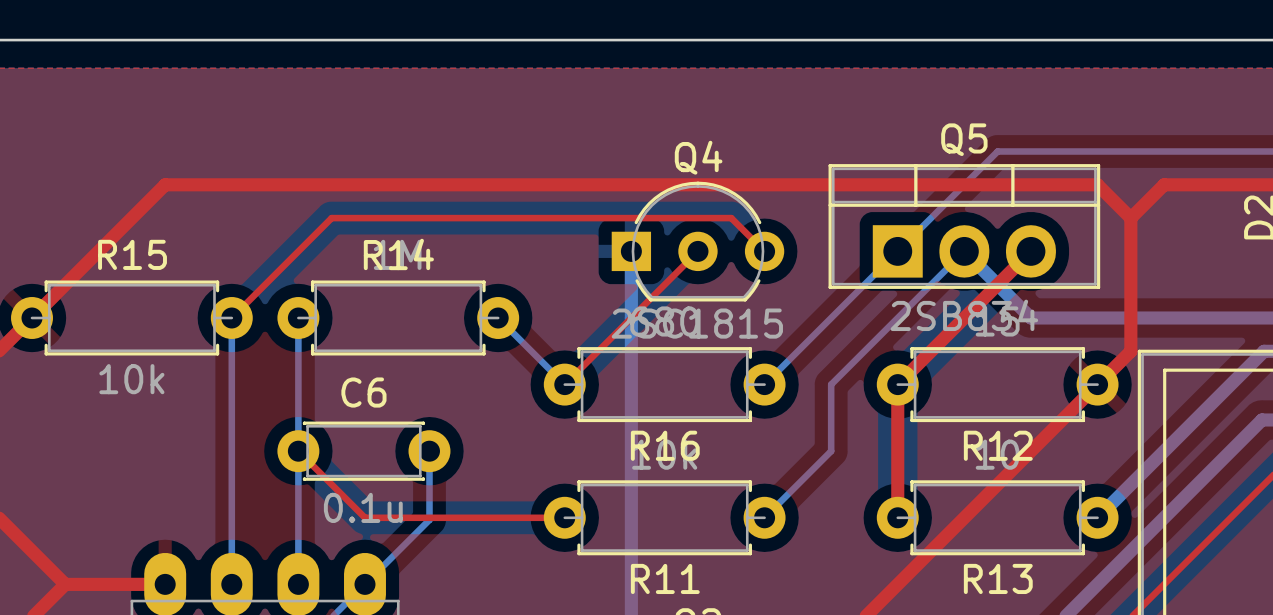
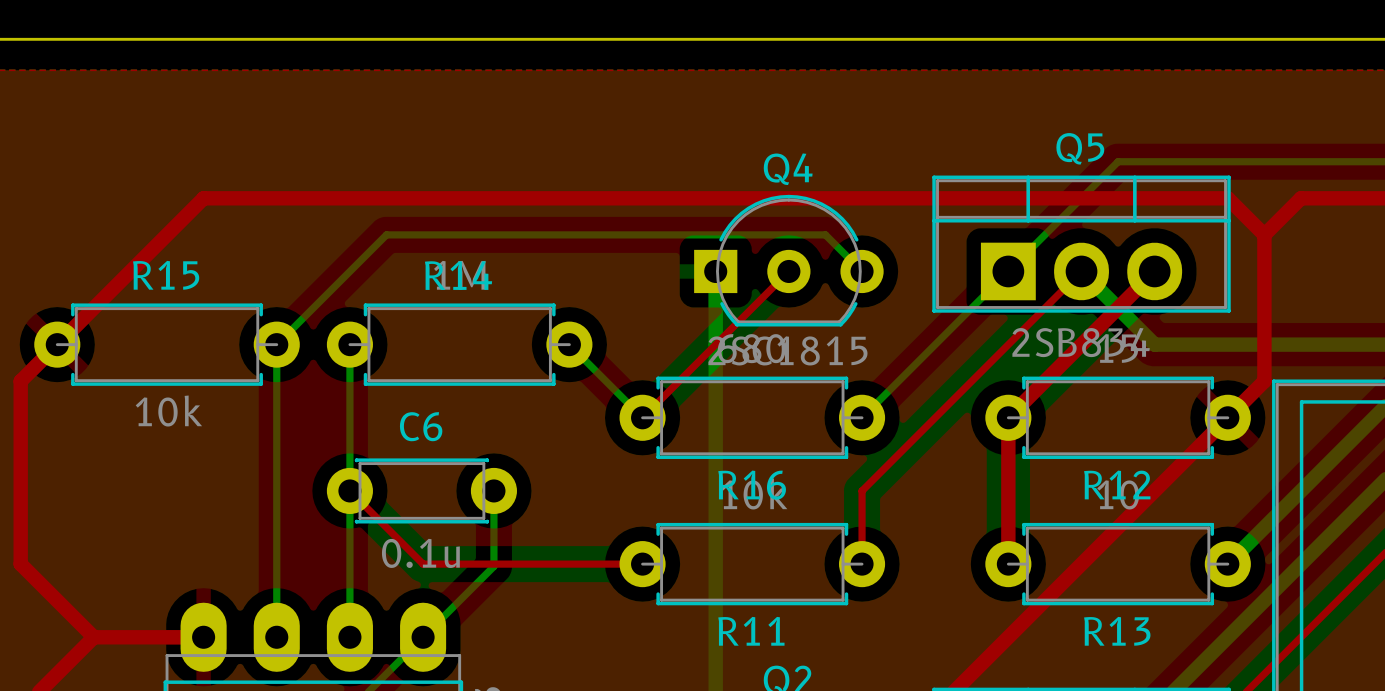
bottom track: none -> (862, 271) (825, 234) (386, 234) (276, 344)
top track: (764, 251) (731, 218) (331, 218) (231, 317) -> none
bottom track: (964, 251) (831, 384) (831, 451) (764, 517) -> none
top track: none -> (1081, 271) (862, 490) (862, 564)

